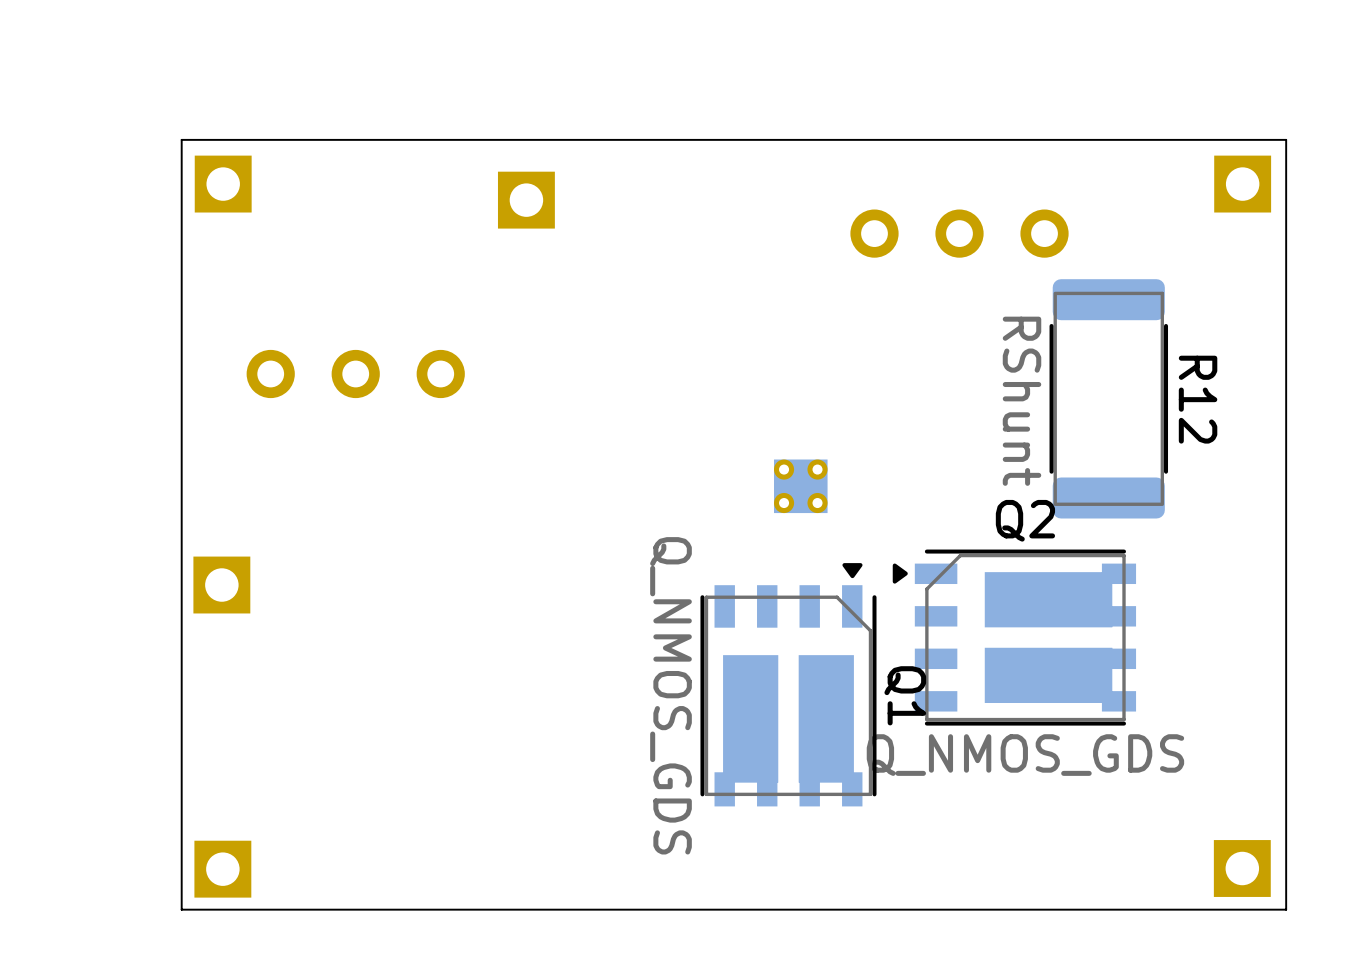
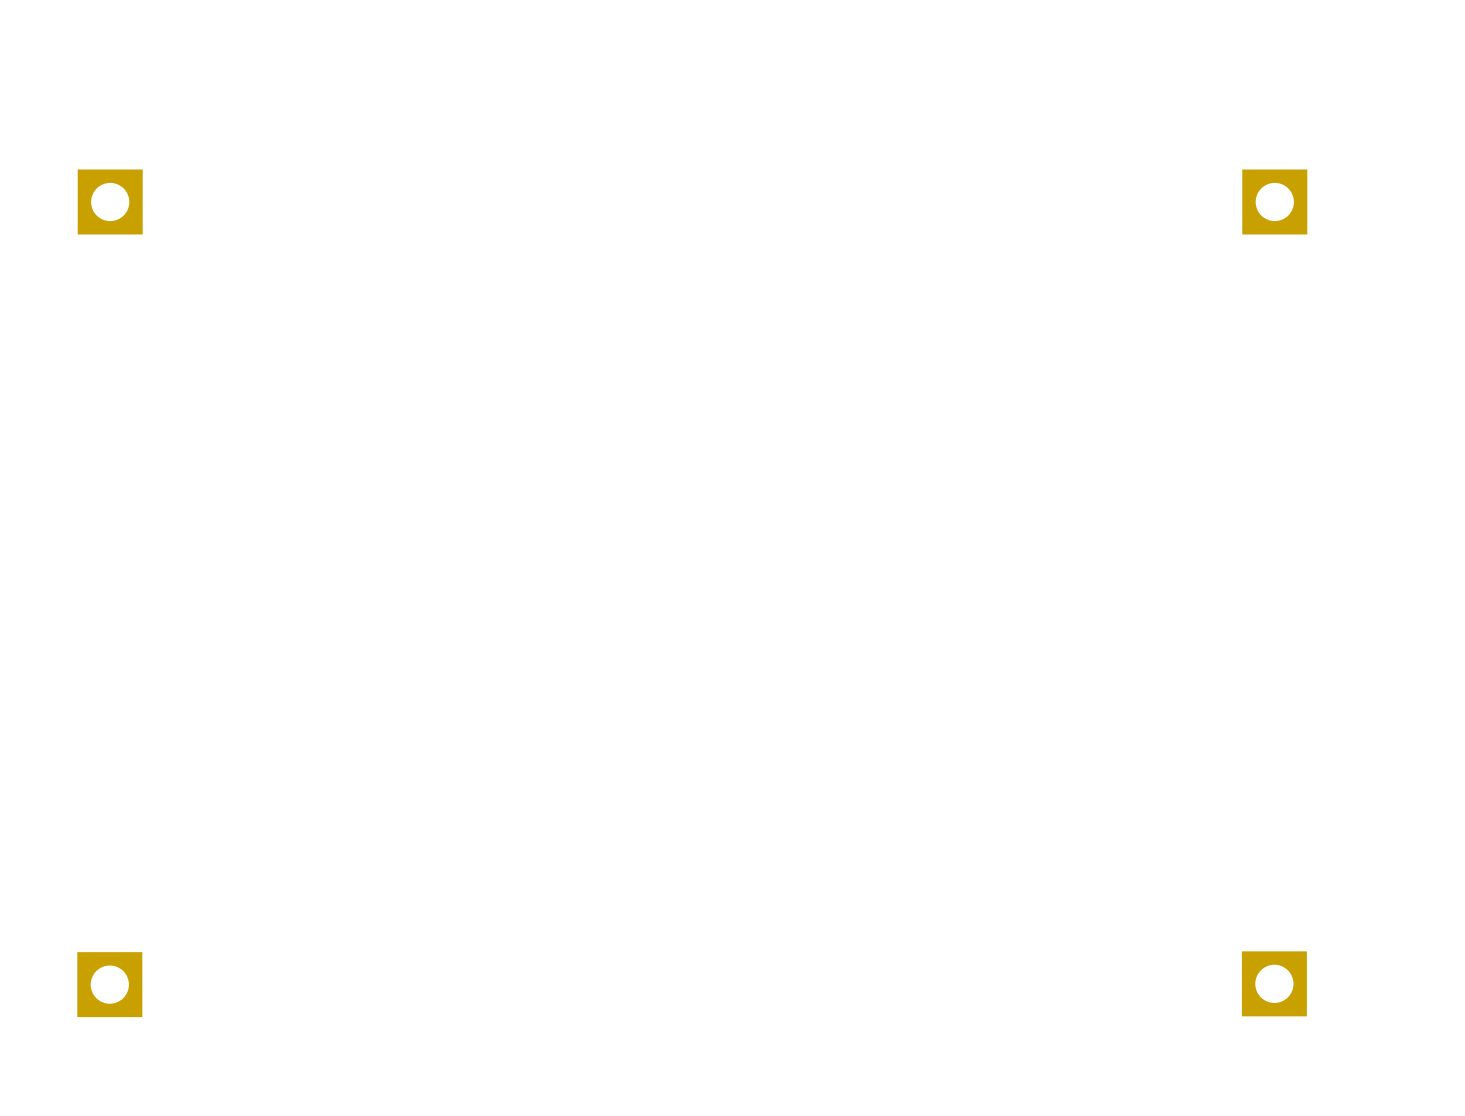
board edge: (1286, 139) (181, 139) (181, 909) (1286, 909) (1286, 139) -> none
part: (526, 200) -> none
part: (959, 233) -> none
part: (355, 374) -> none
R12: RShunt (1108, 398) -> none
part: (800, 486) -> none
part: (221, 585) -> none
Q2: Q_NMOS_GDS (1014, 637) -> none
Q1: Q_NMOS_GDS (788, 684) -> none

